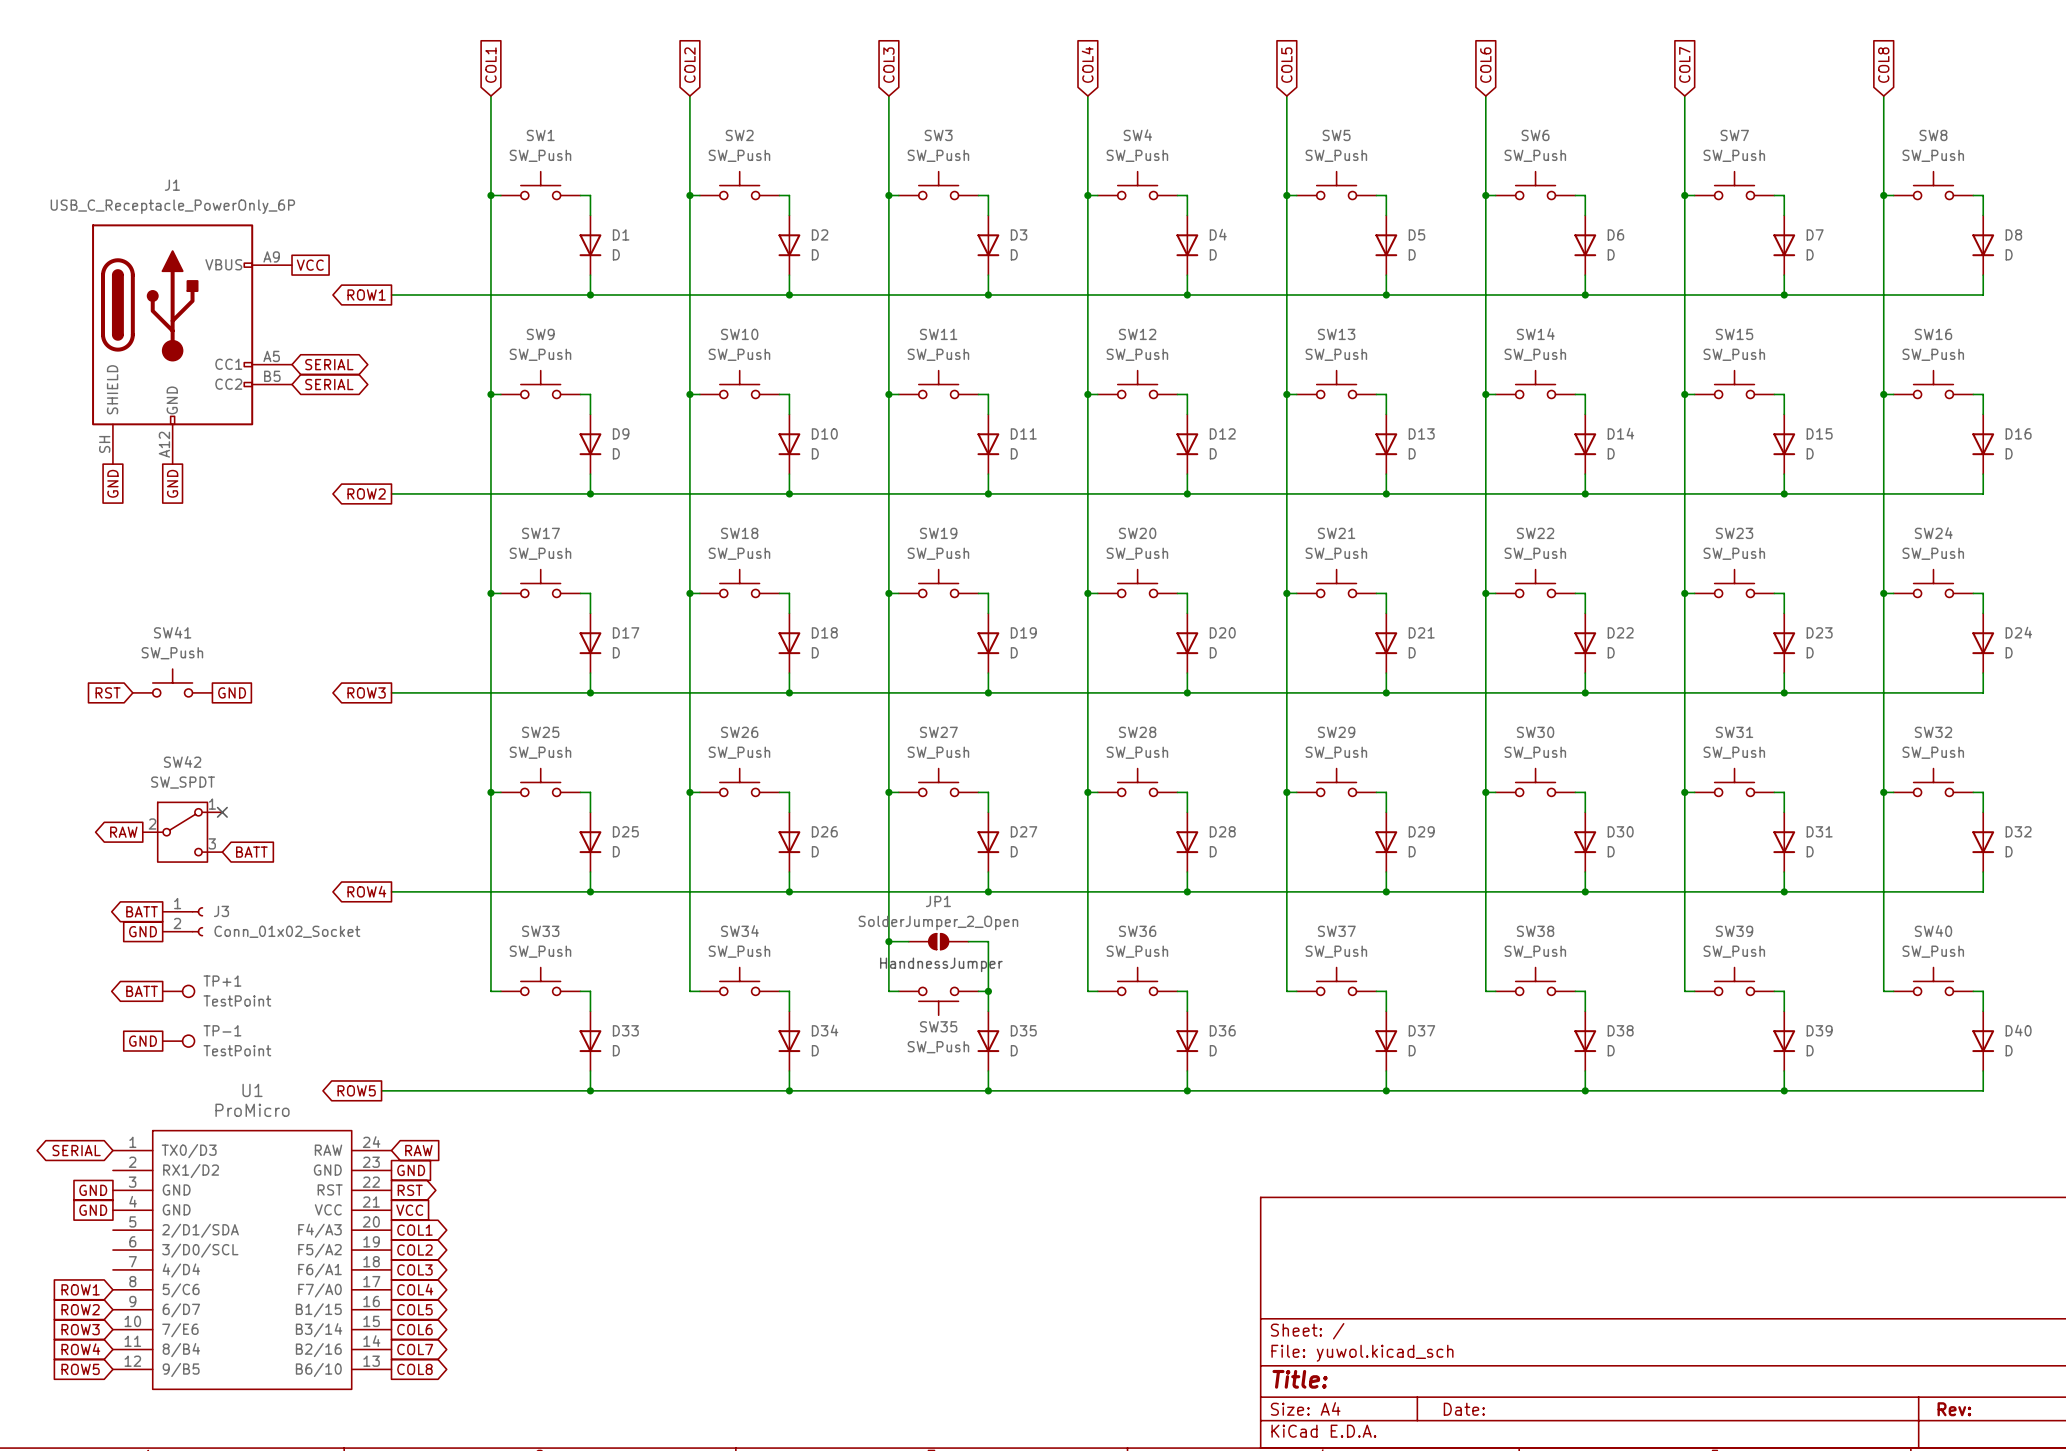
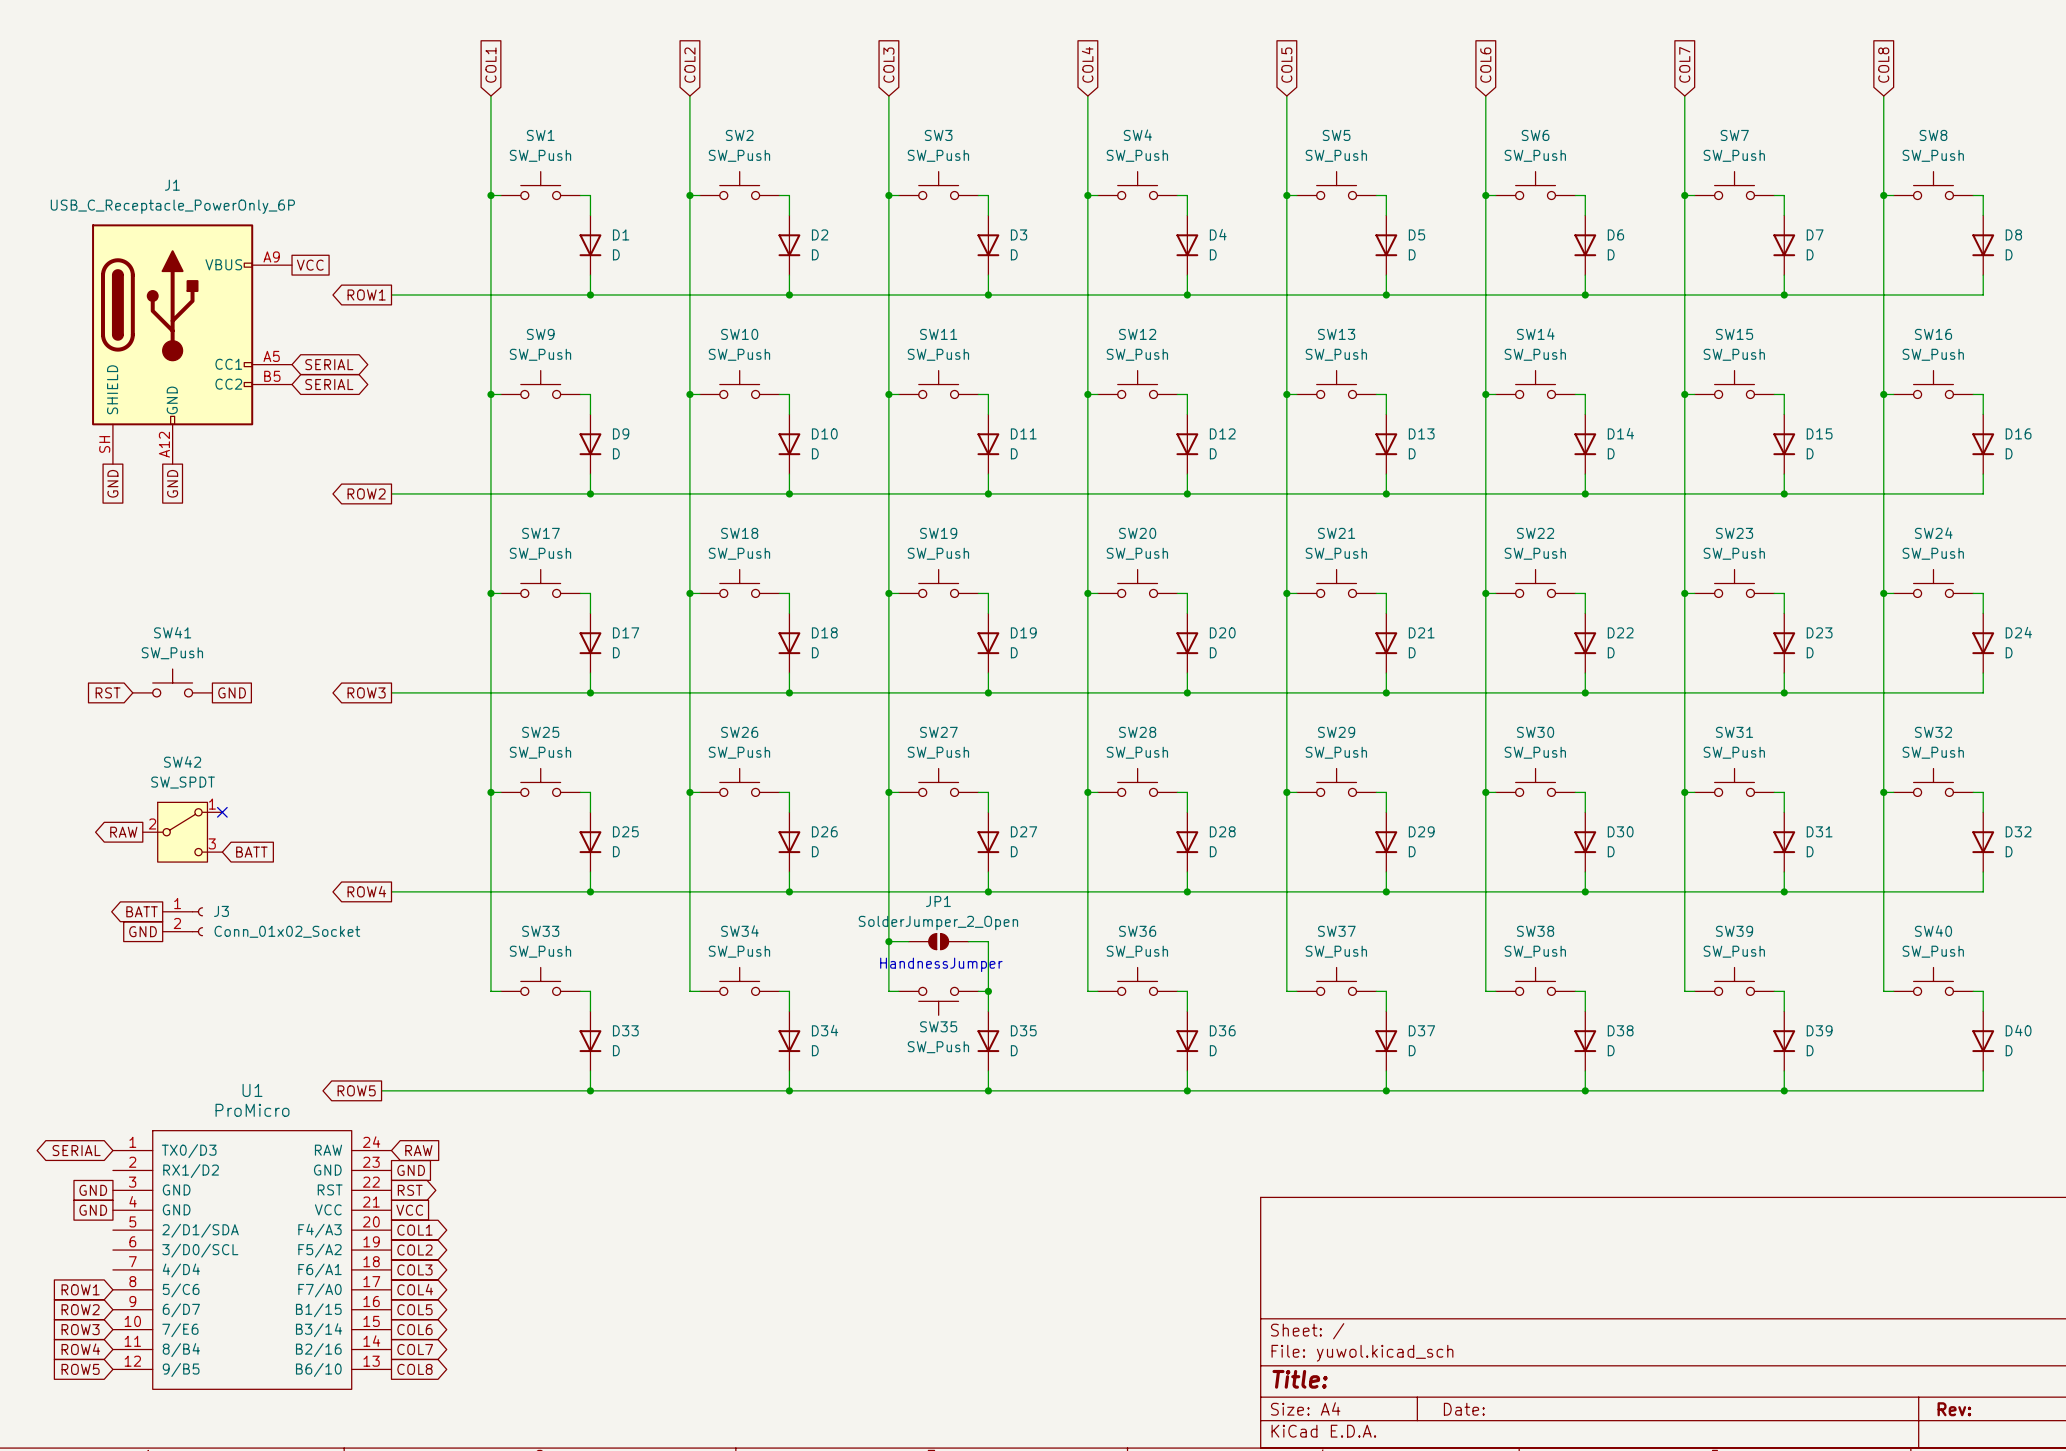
global label: BATT (142, 991) -> none
TP+1: TestPoint (178, 991) -> none
global label: GND (143, 1041) -> none
TP-1: TestPoint (178, 1041) -> none

